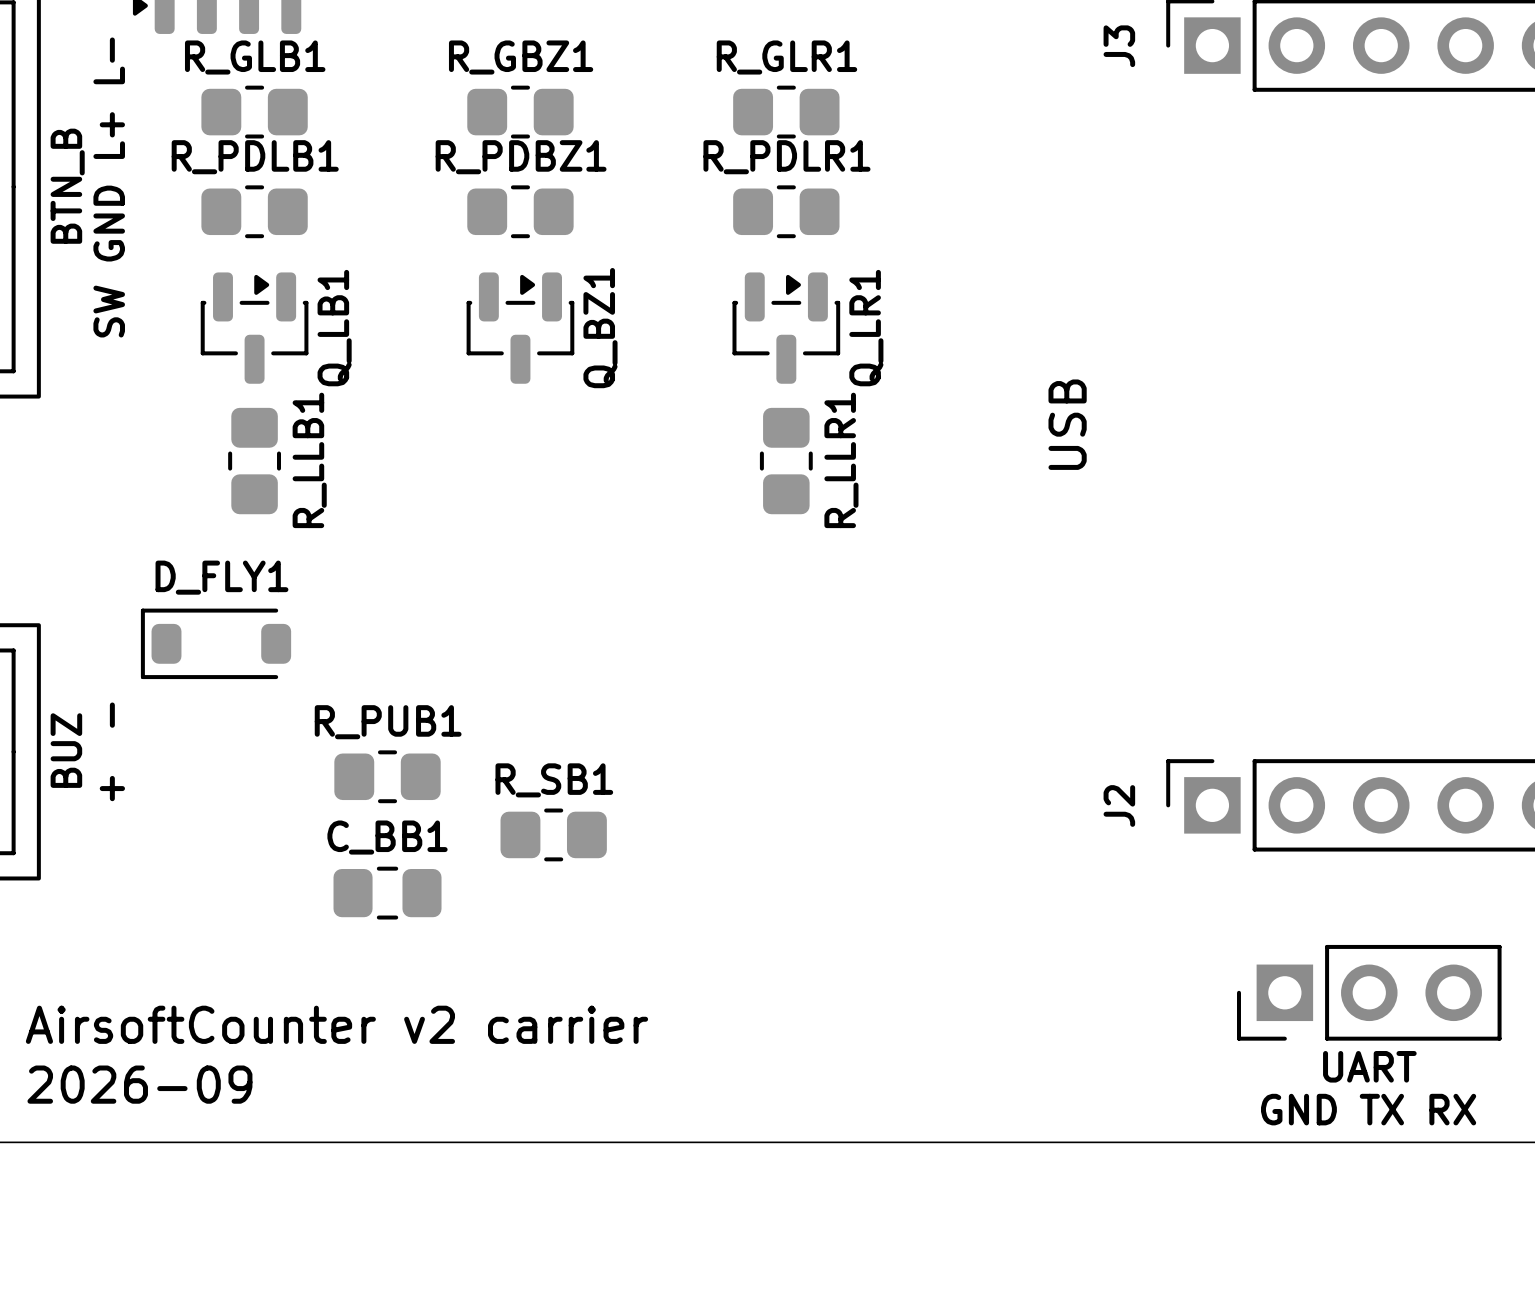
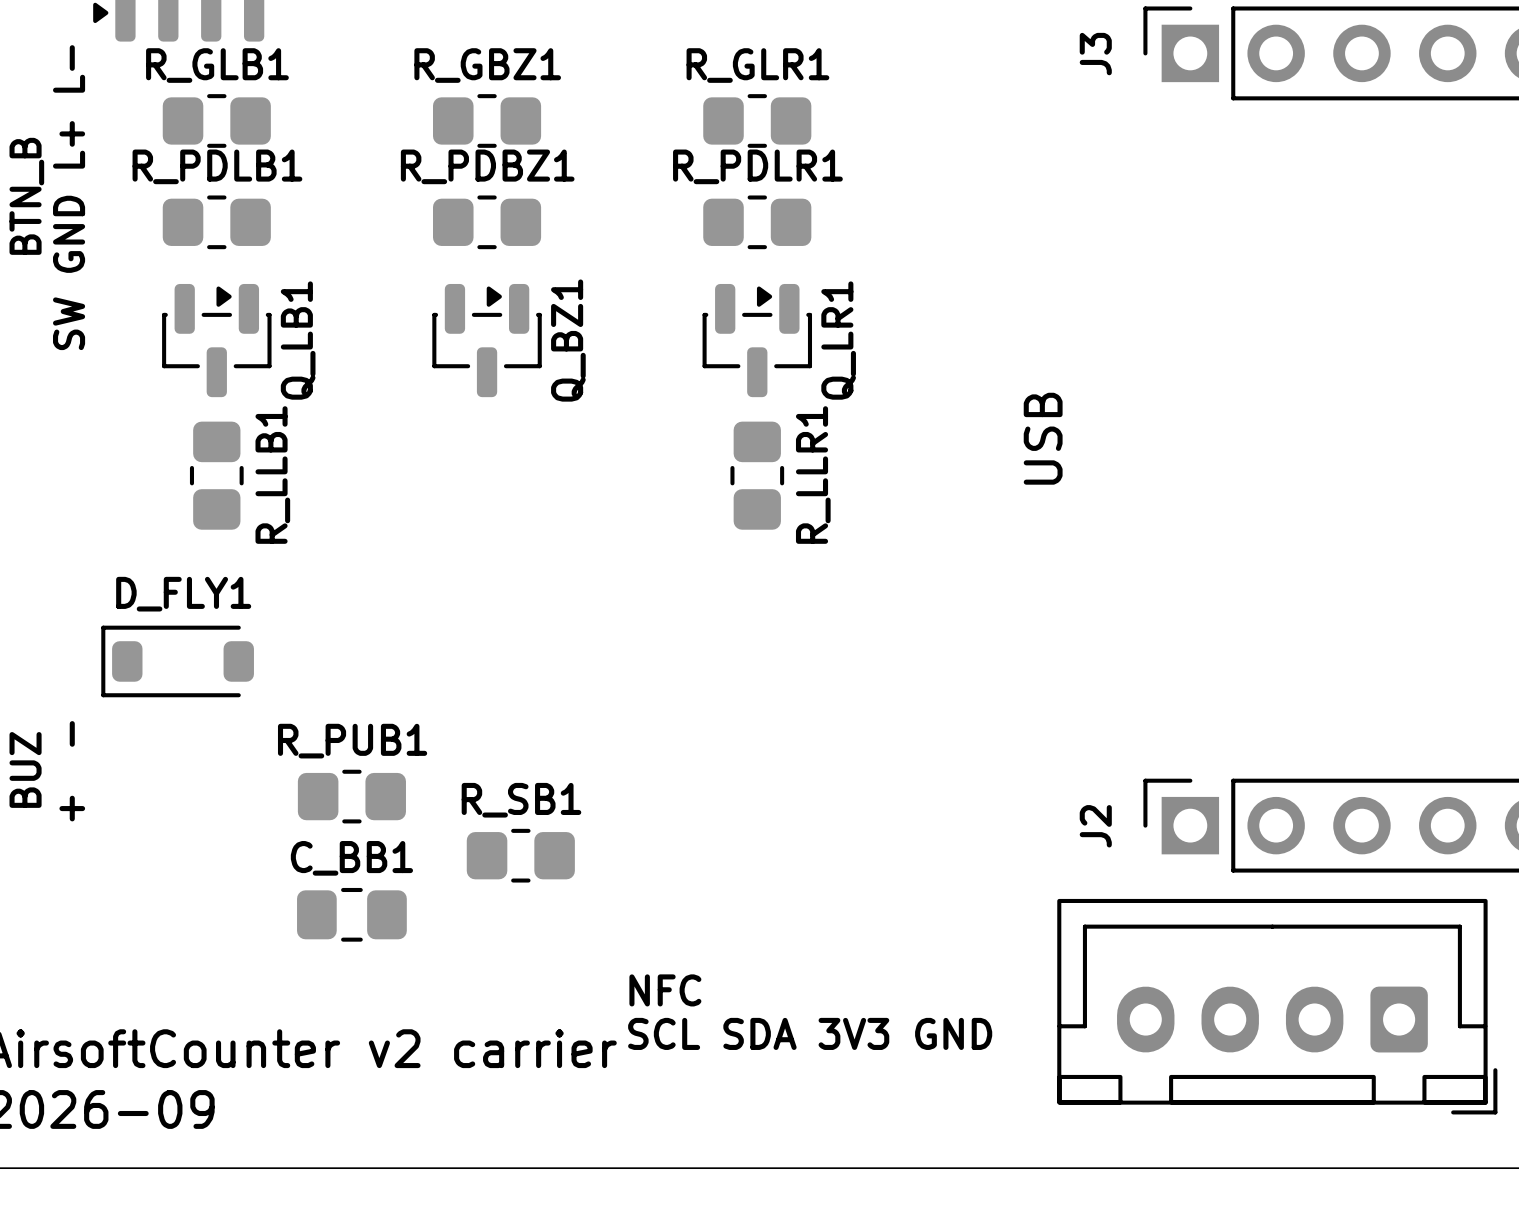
text: none -> NFC (665, 990)
part: none -> (1277, 1006)
part: (1369, 992) -> none
text: none -> SCL SDA 3V3 GND (810, 1033)
text: UART (1369, 1066) -> none
text: GND TX RX (1368, 1109) -> none

